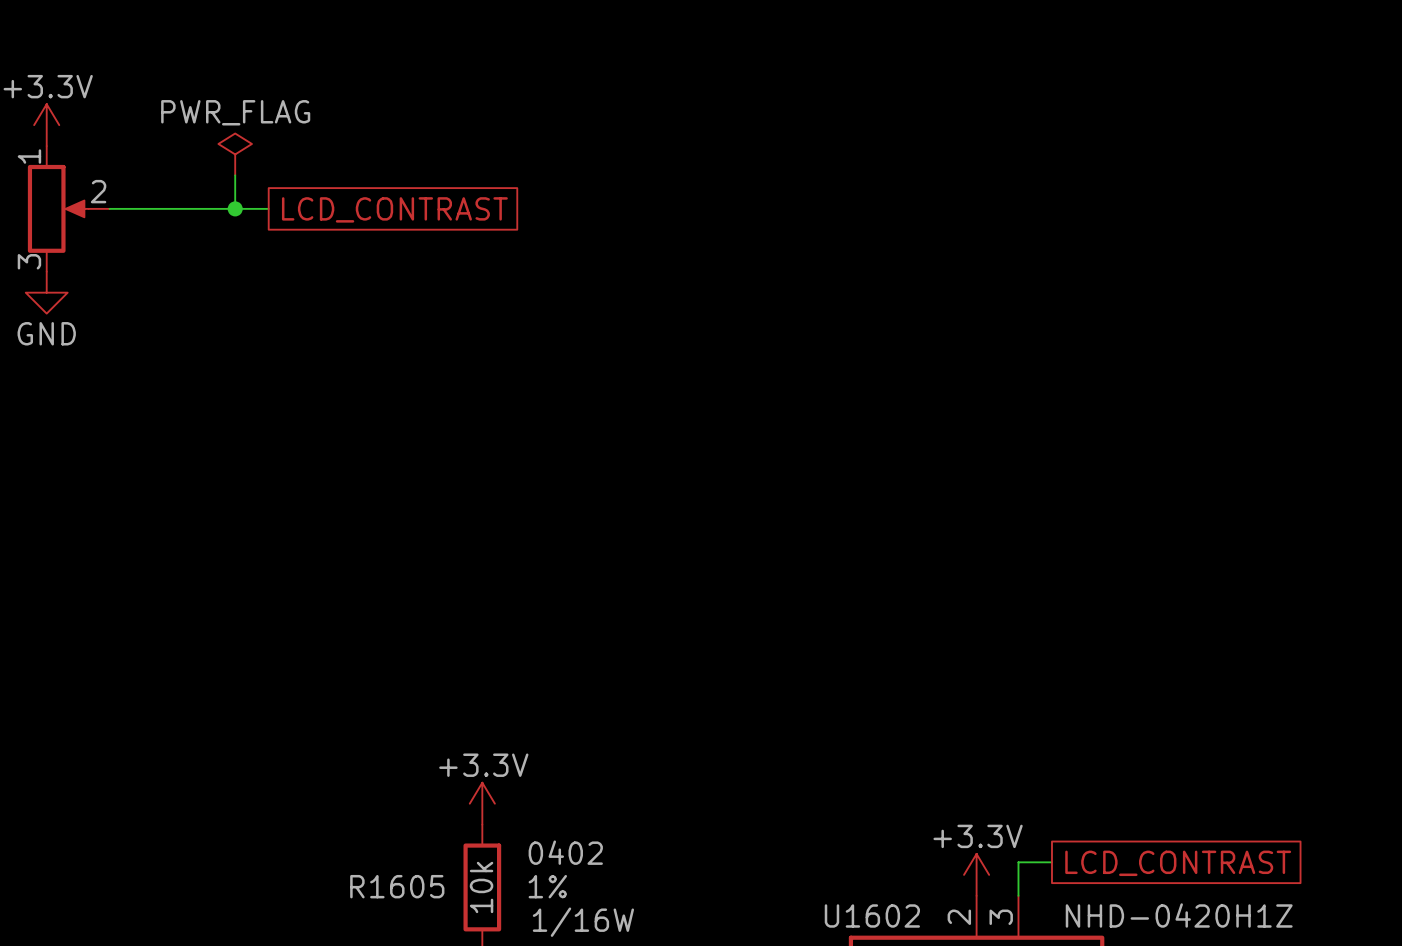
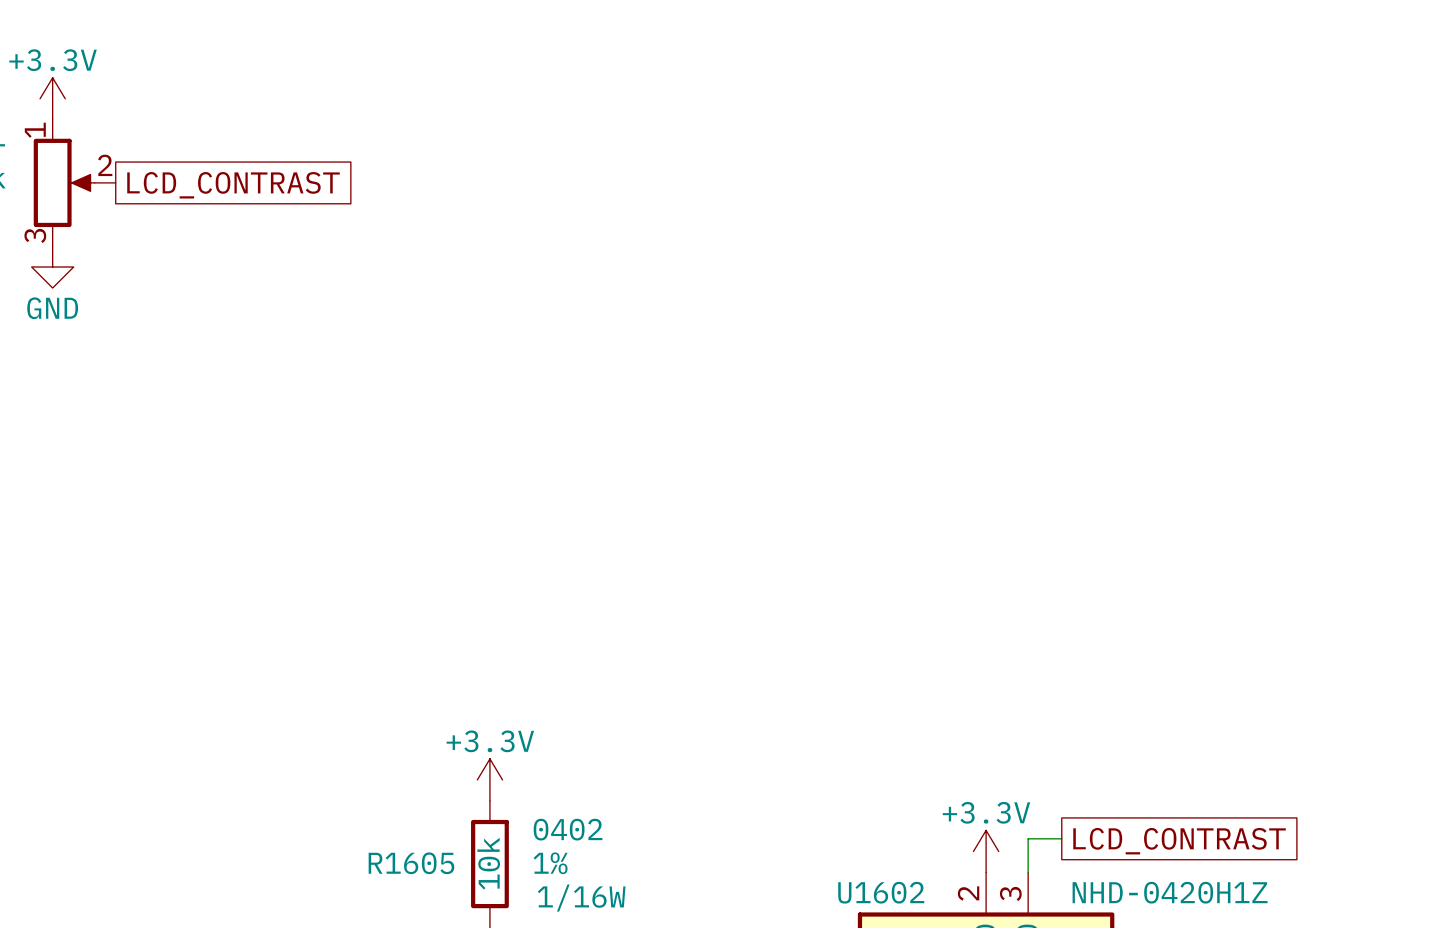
power symbol: PWR_FLAG (235, 154) -> none
wire: (235, 175) (235, 208) -> none
wire: (109, 208) (268, 208) -> none
junction: (235, 208) -> none
global label position: LCD_CONTRAST (394, 209) -> LCD_CONTRAST (233, 185)

